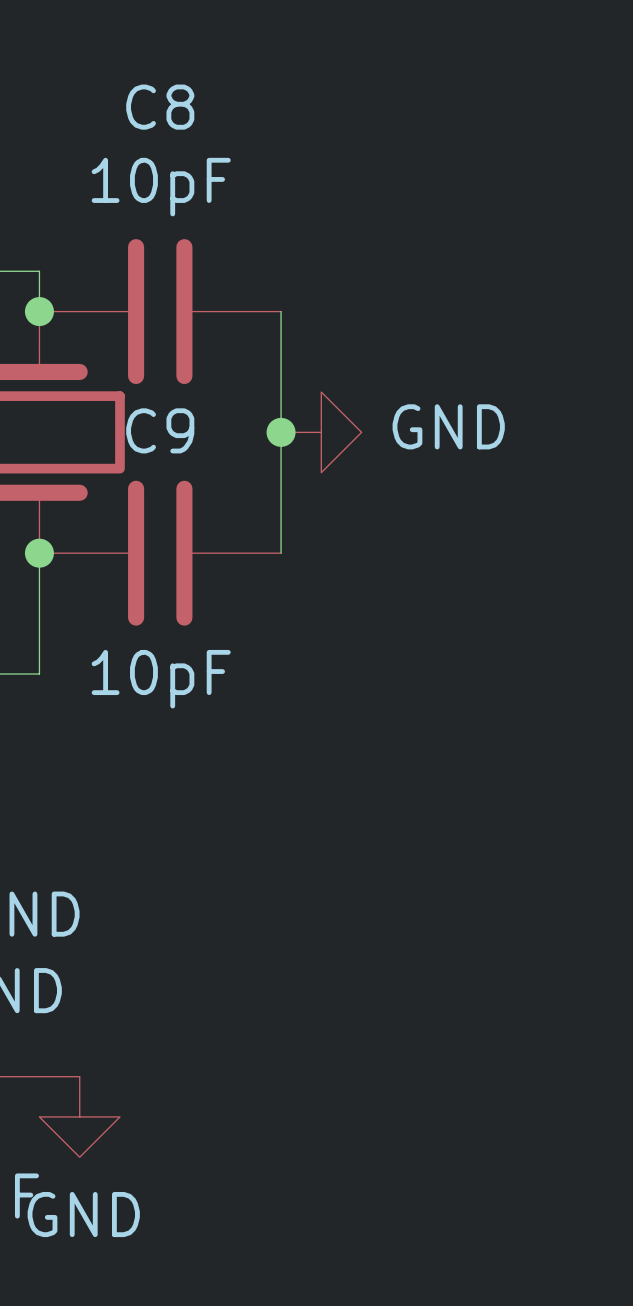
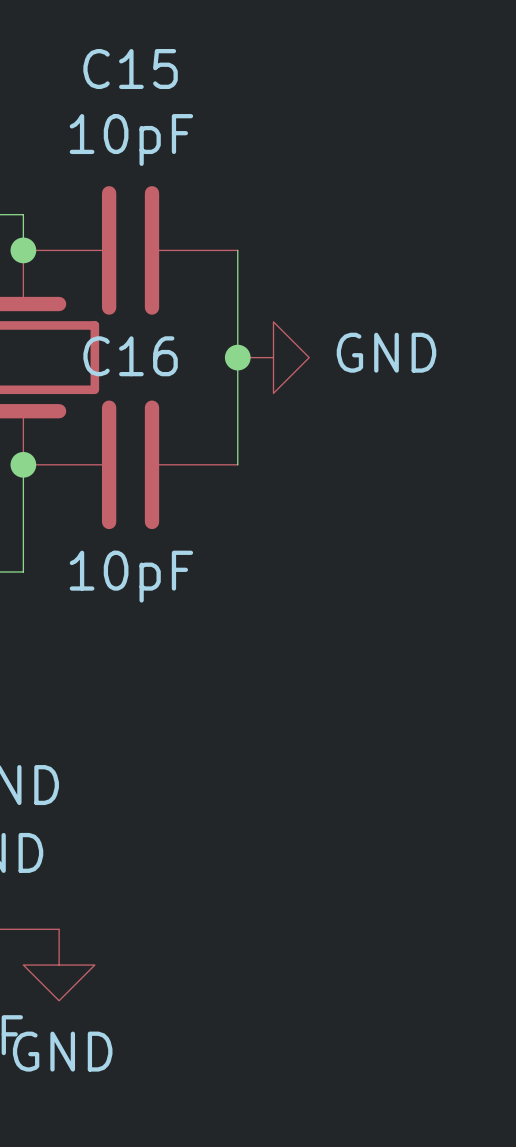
C8 name: C8 (160, 107) -> C15 (130, 69)
C9 name: C9 (160, 430) -> C16 (130, 356)

